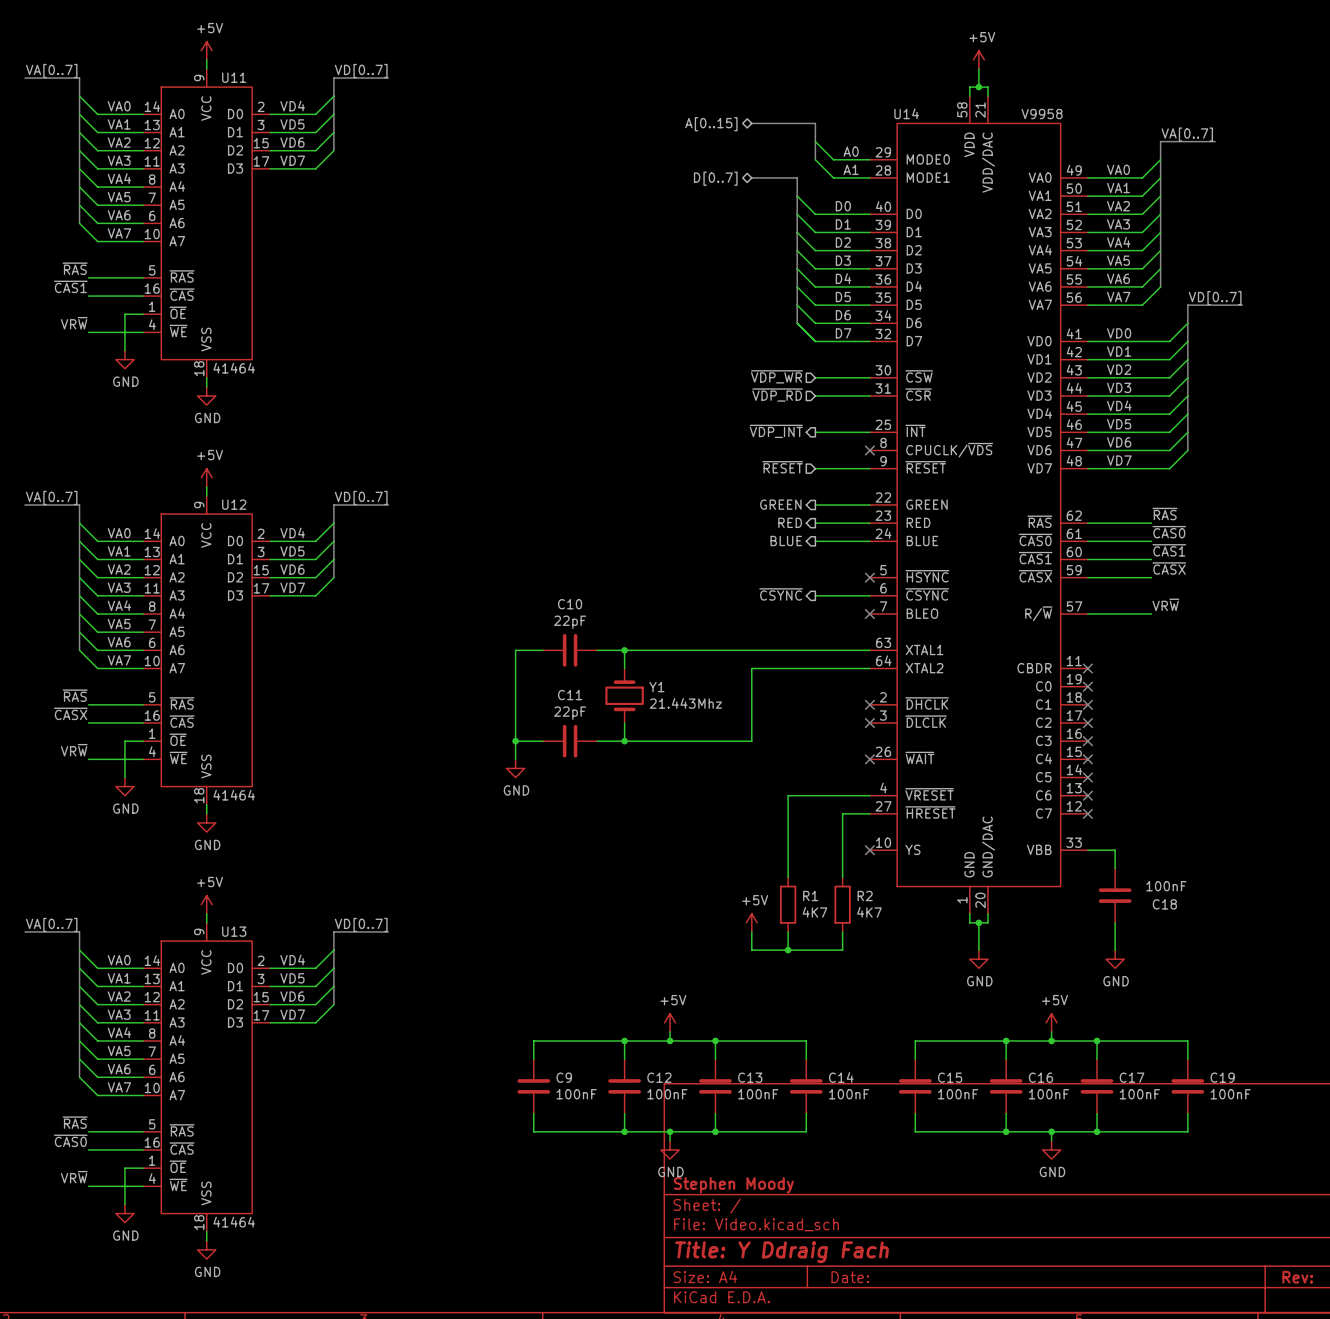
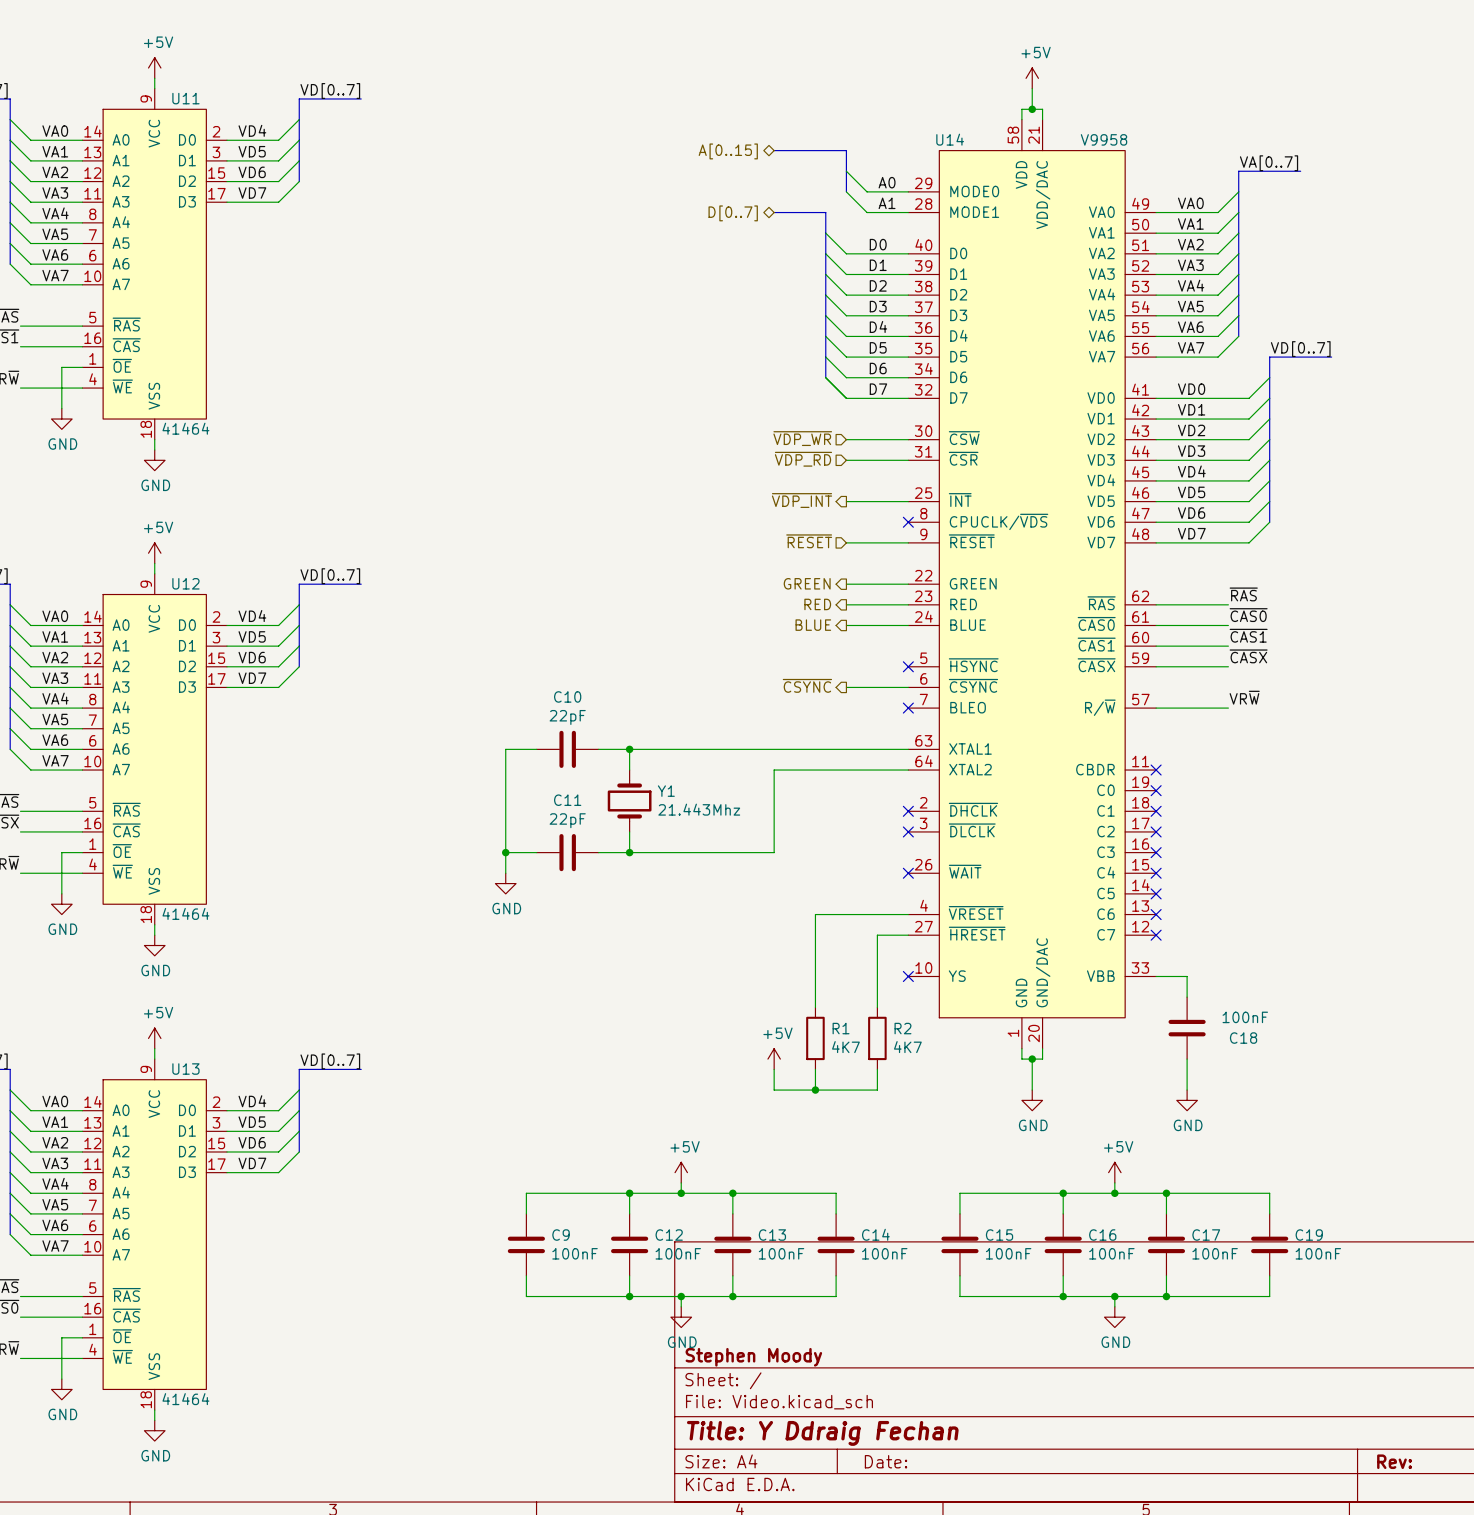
title block: Title: Y Ddraig Fach (782, 1252) -> Title: Y Ddraig Fechan (822, 1433)

